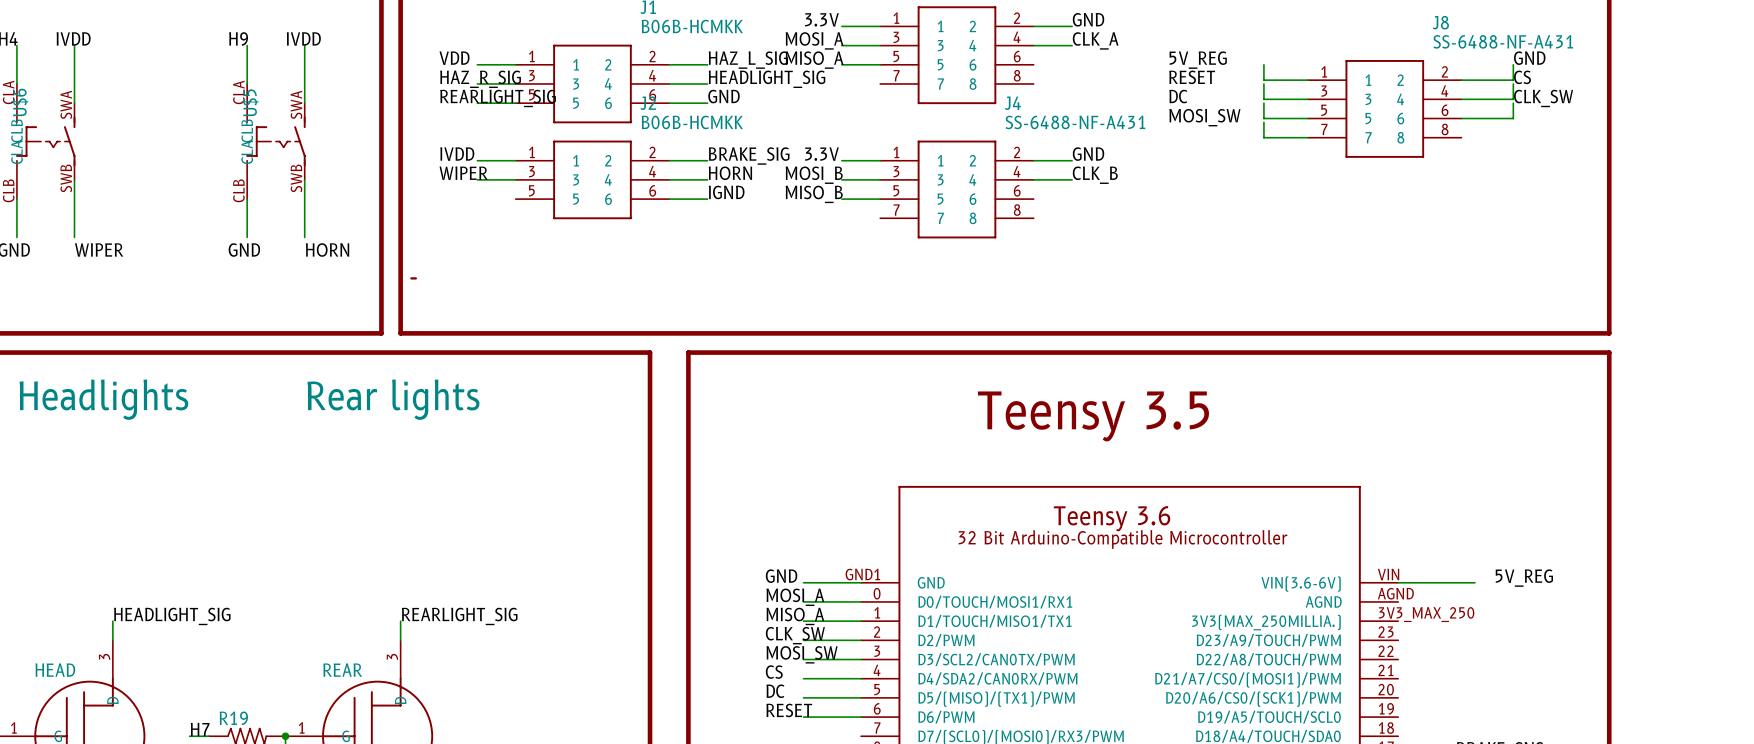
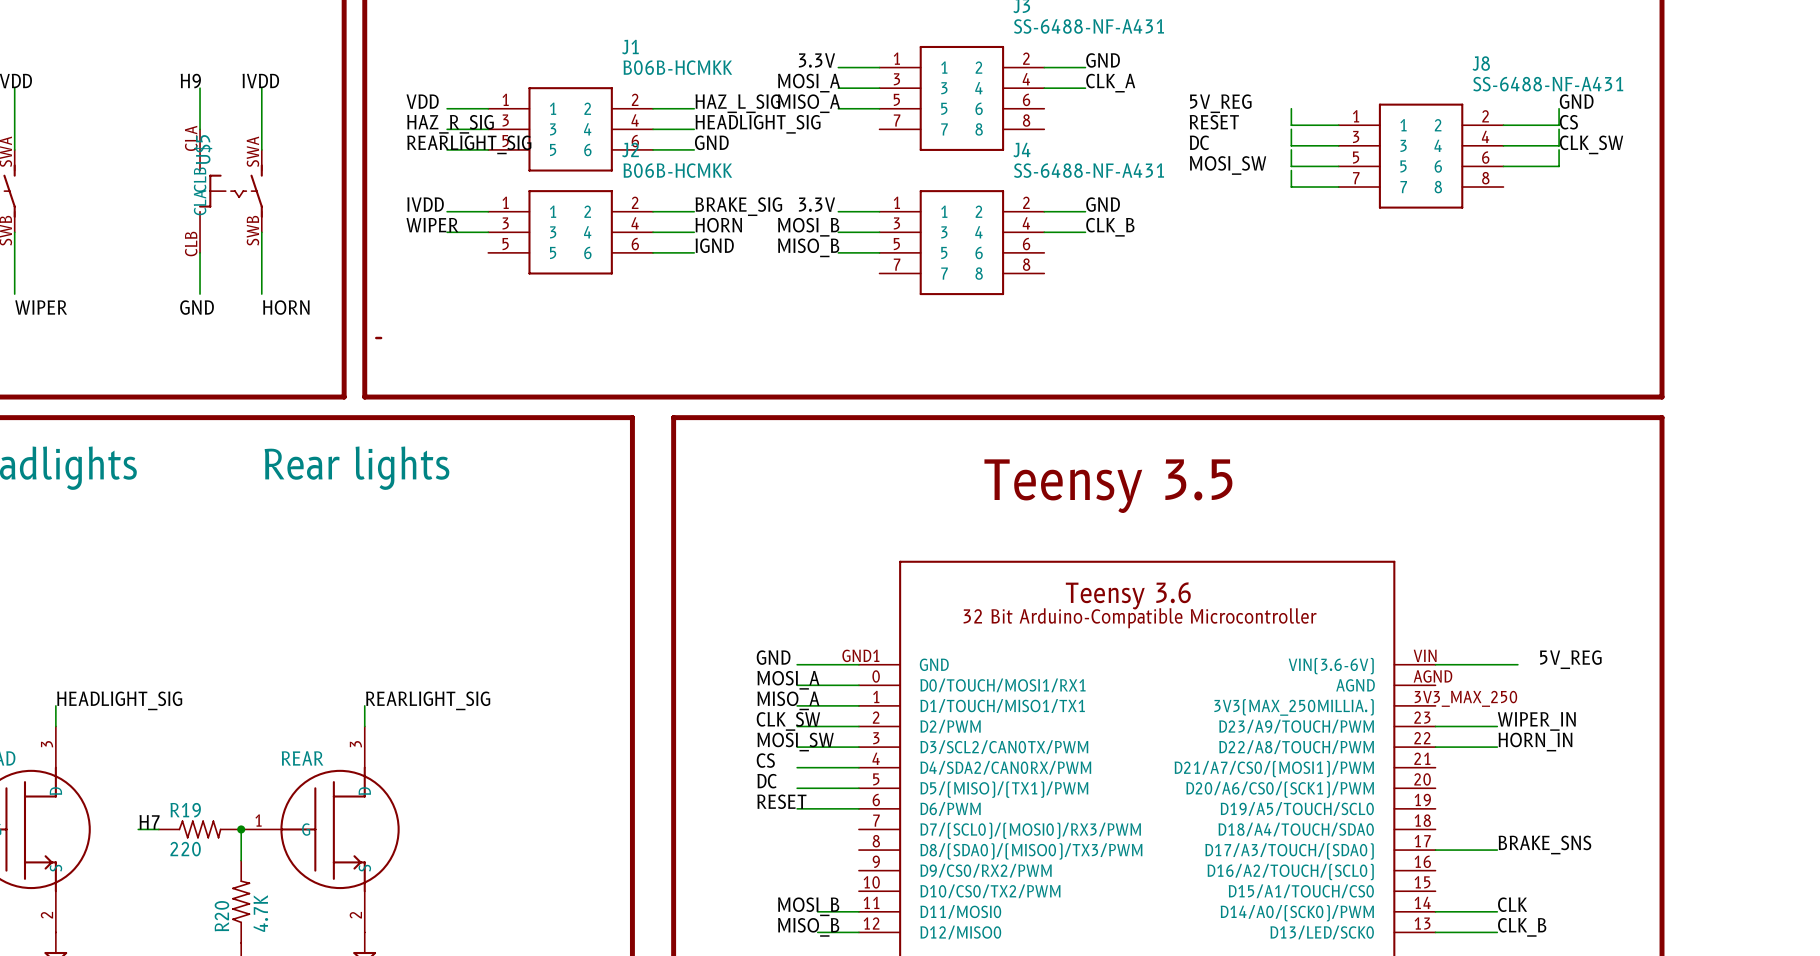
label: none -> WIPER_IN (1536, 721)
wire: none -> (1435, 726) (1497, 726)
label: none -> HORN_IN (1535, 742)
wire: none -> (1435, 747) (1497, 747)

